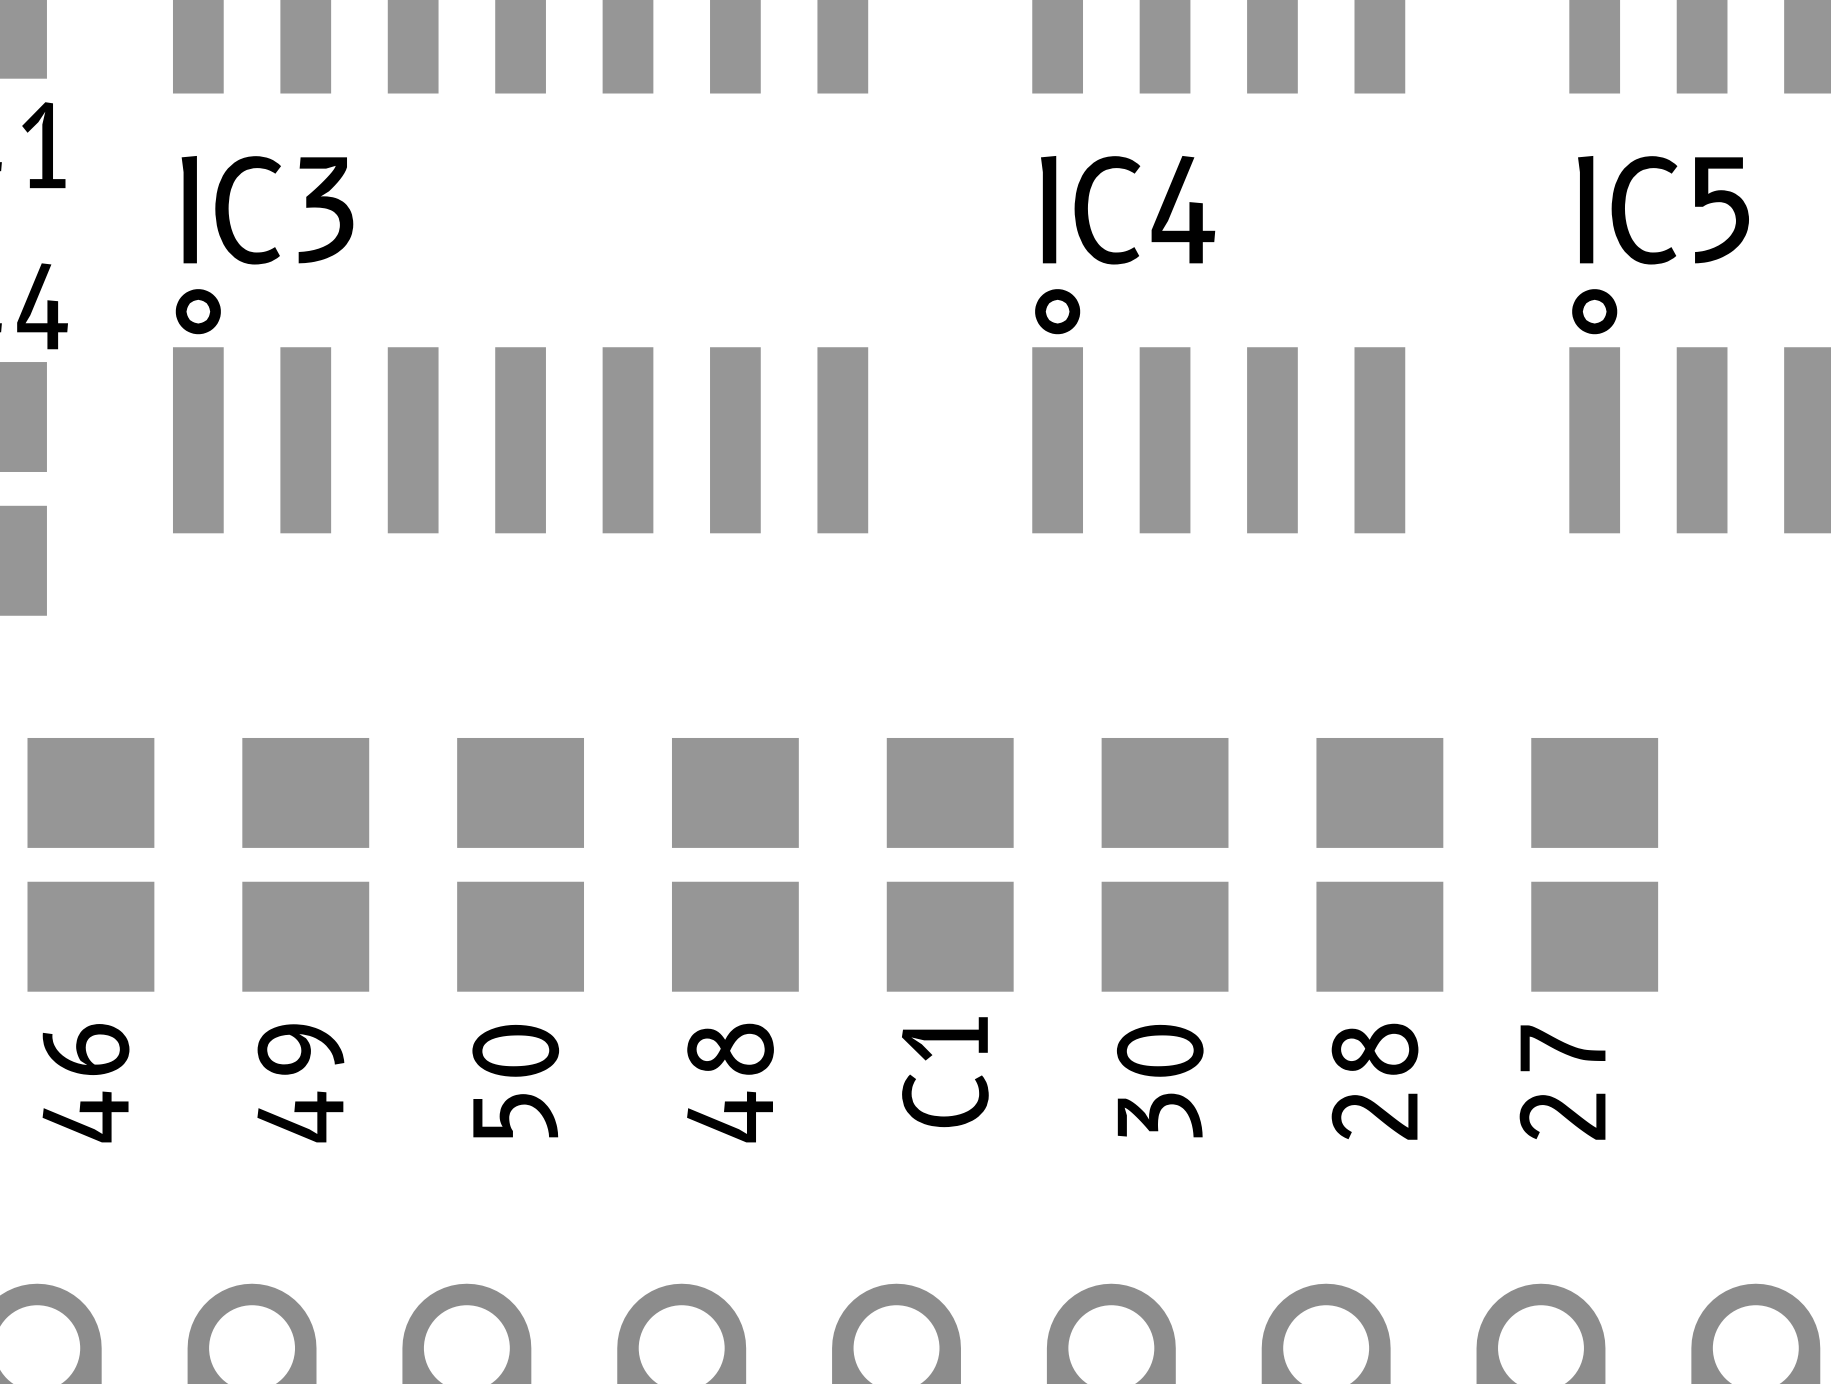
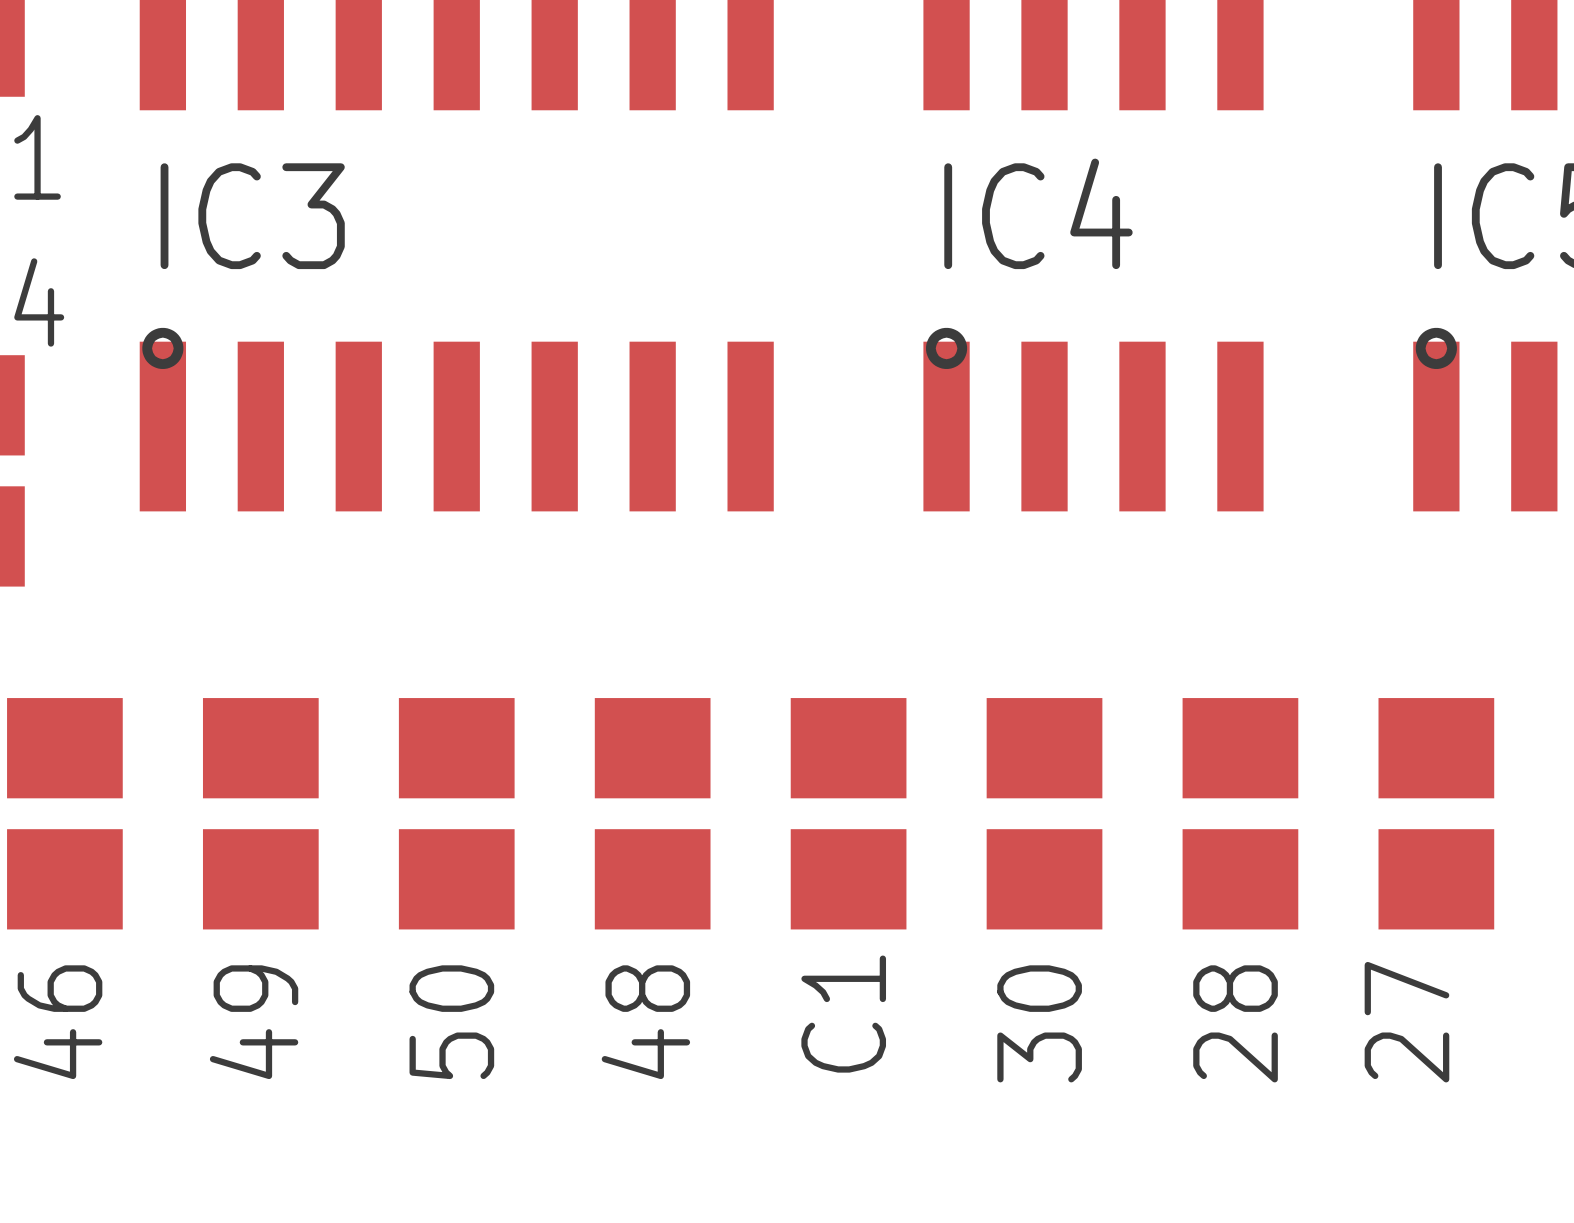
drawing position: (198, 311) -> (162, 348)
drawing position: (1057, 311) -> (946, 348)
drawing position: (1594, 311) -> (1436, 348)

